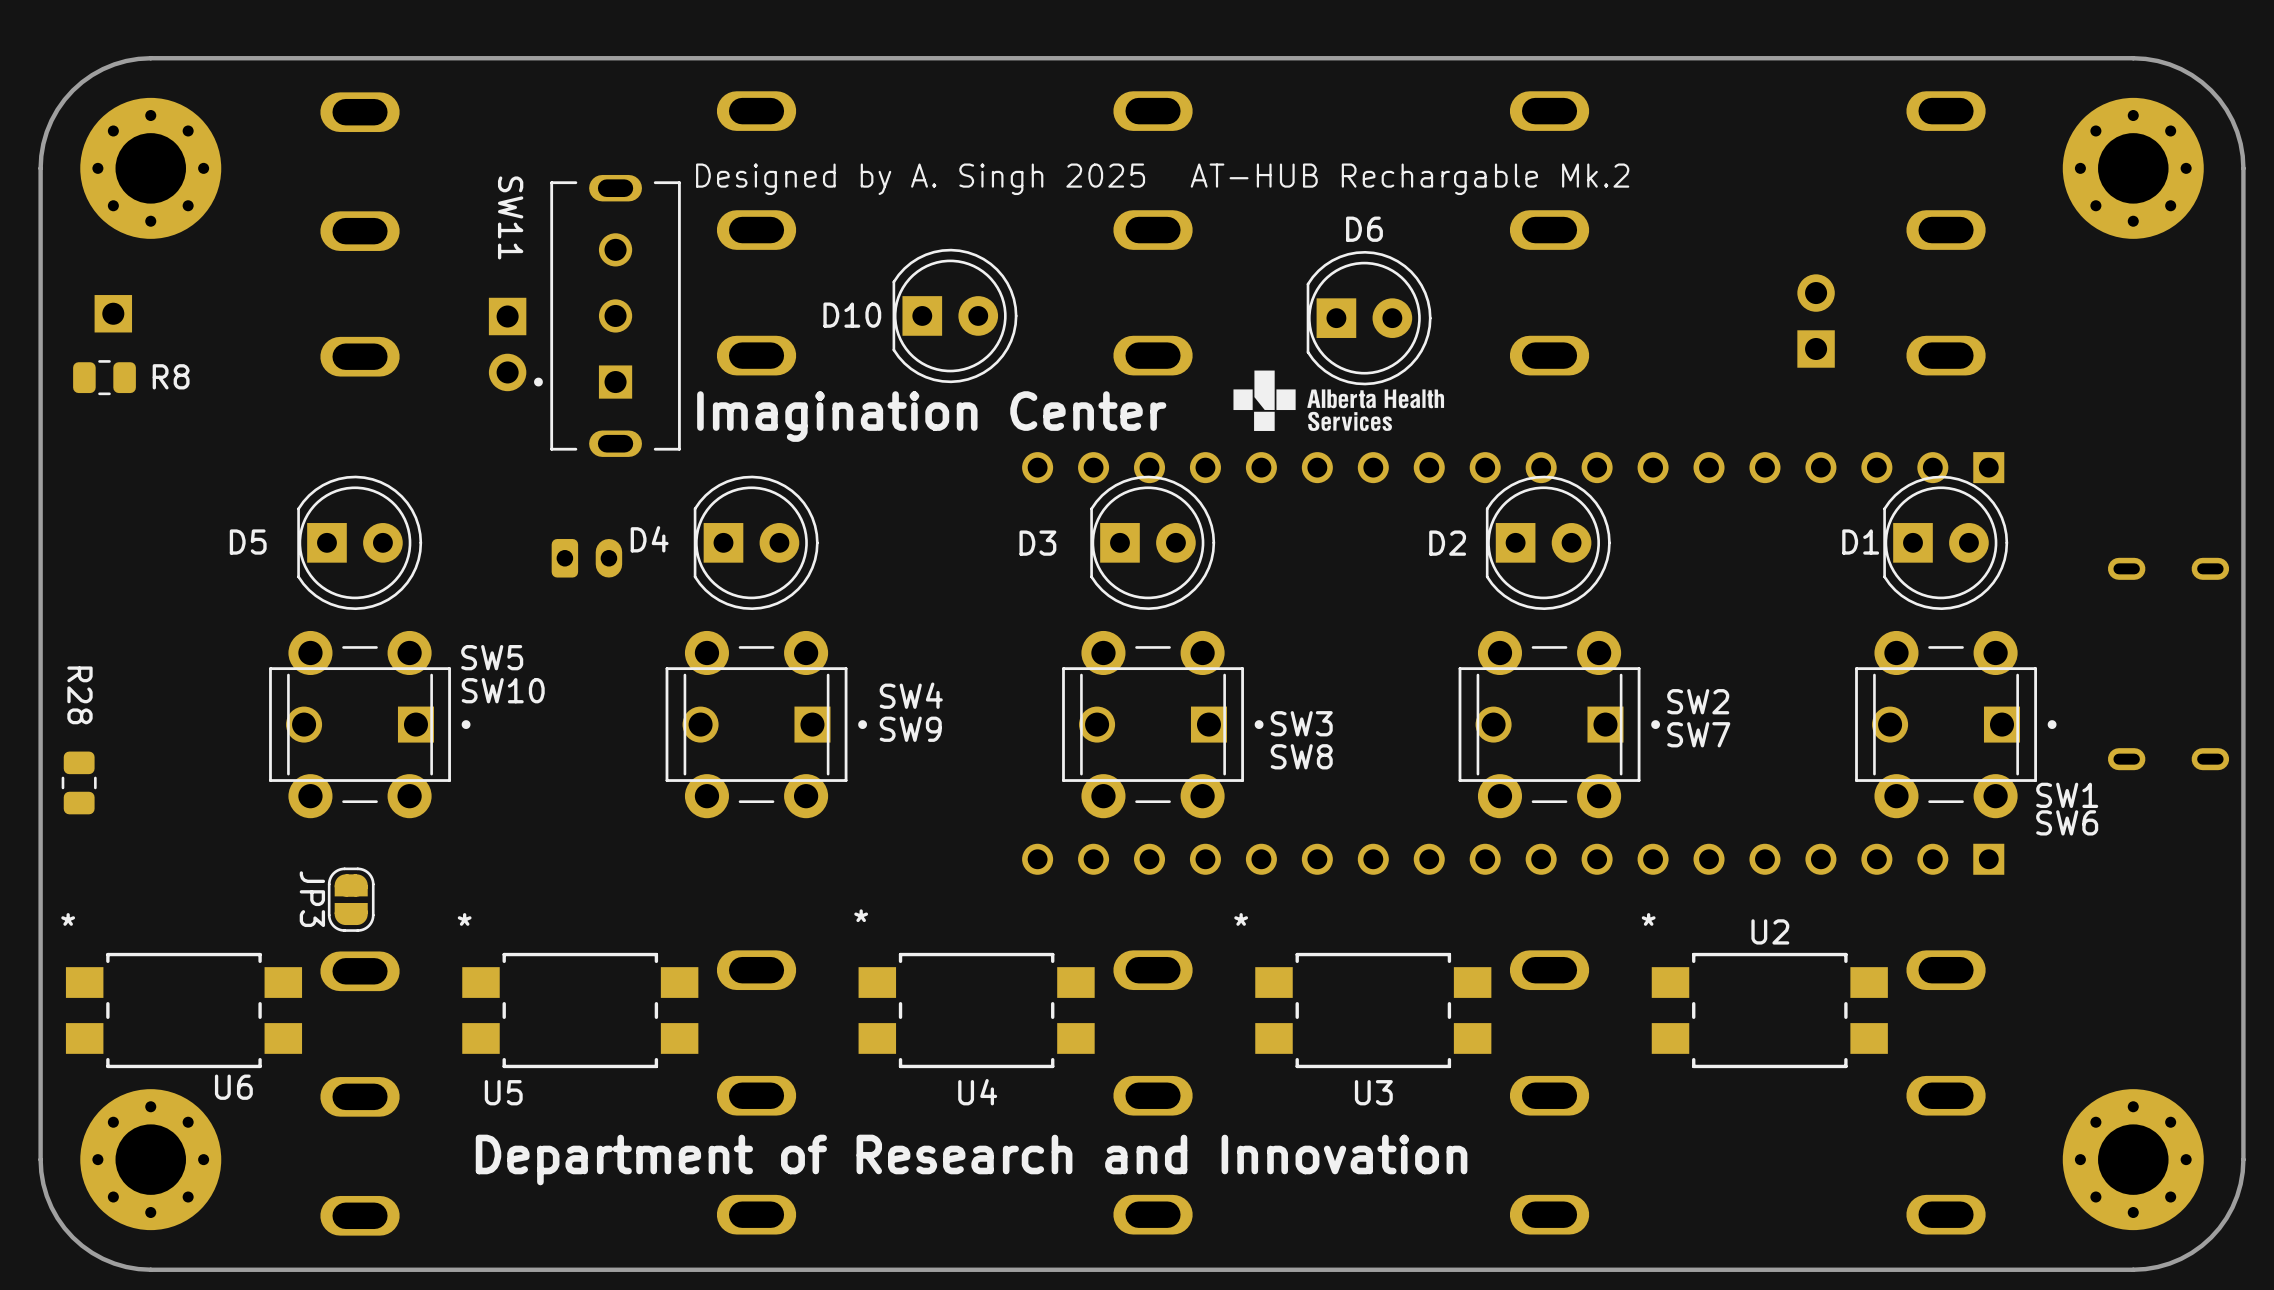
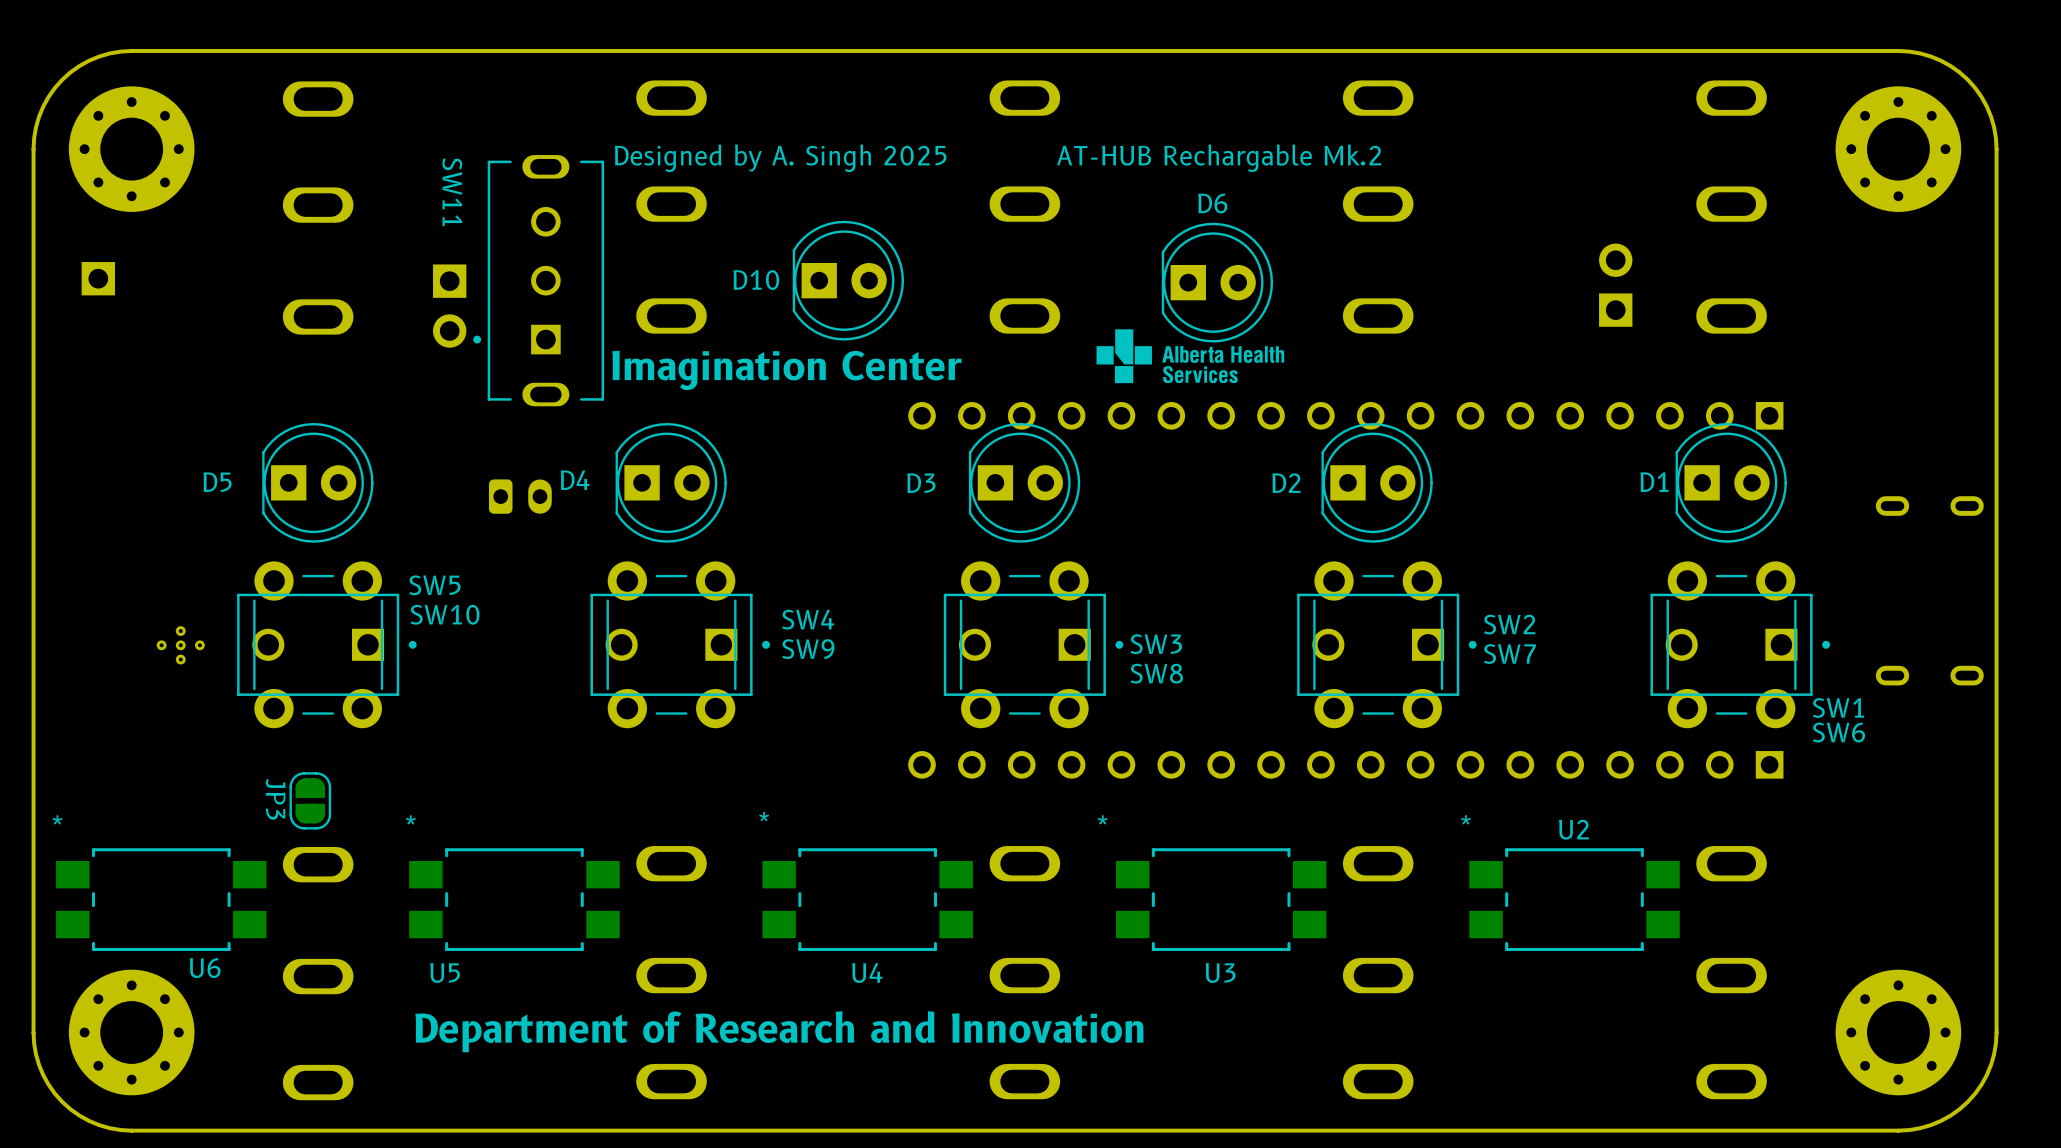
R8: (104, 377) -> none
part: none -> (180, 645)
R28: (79, 782) -> none

